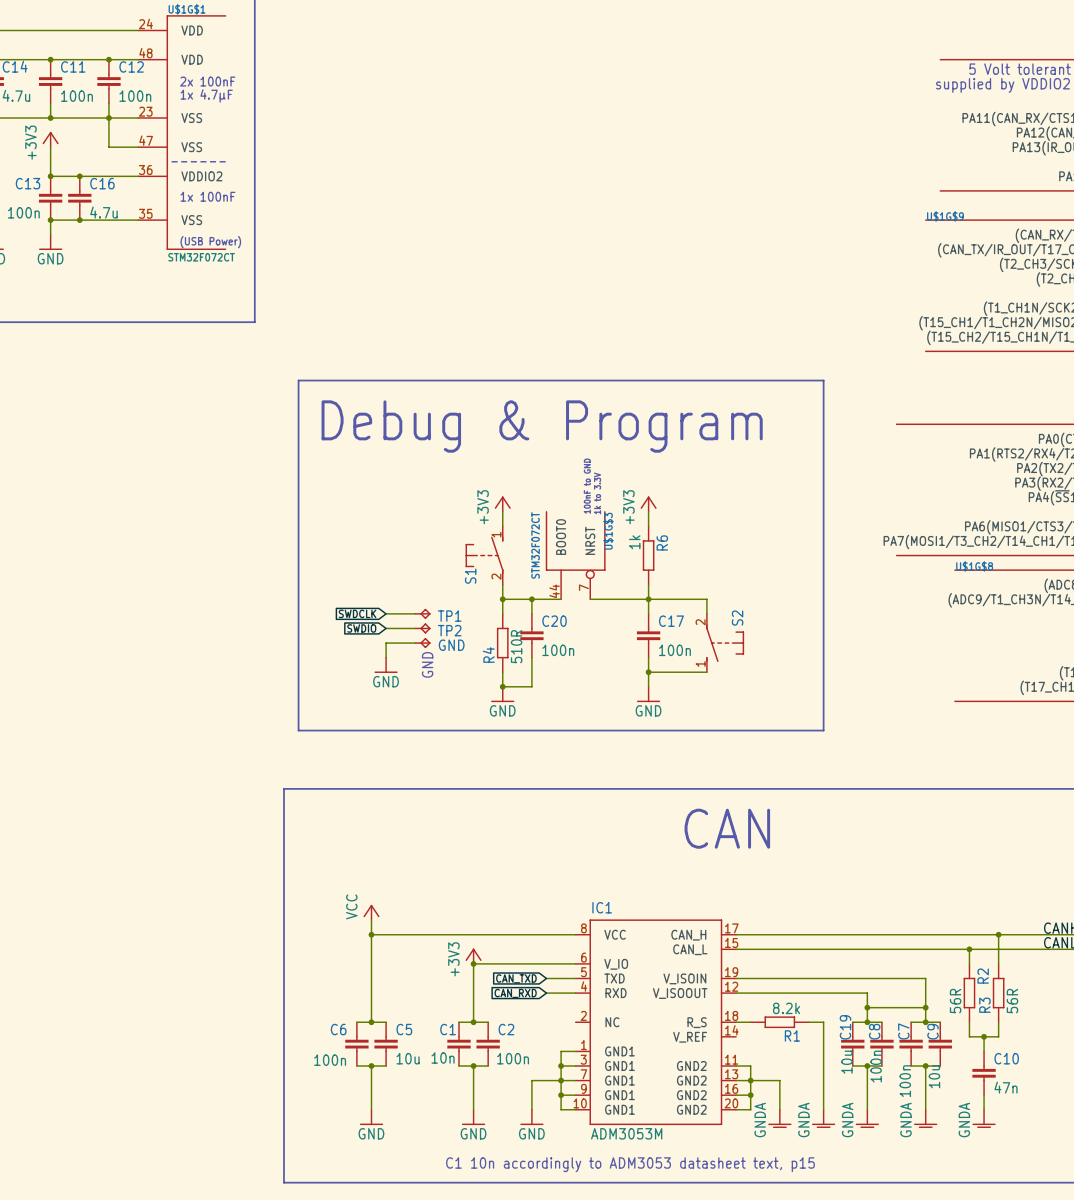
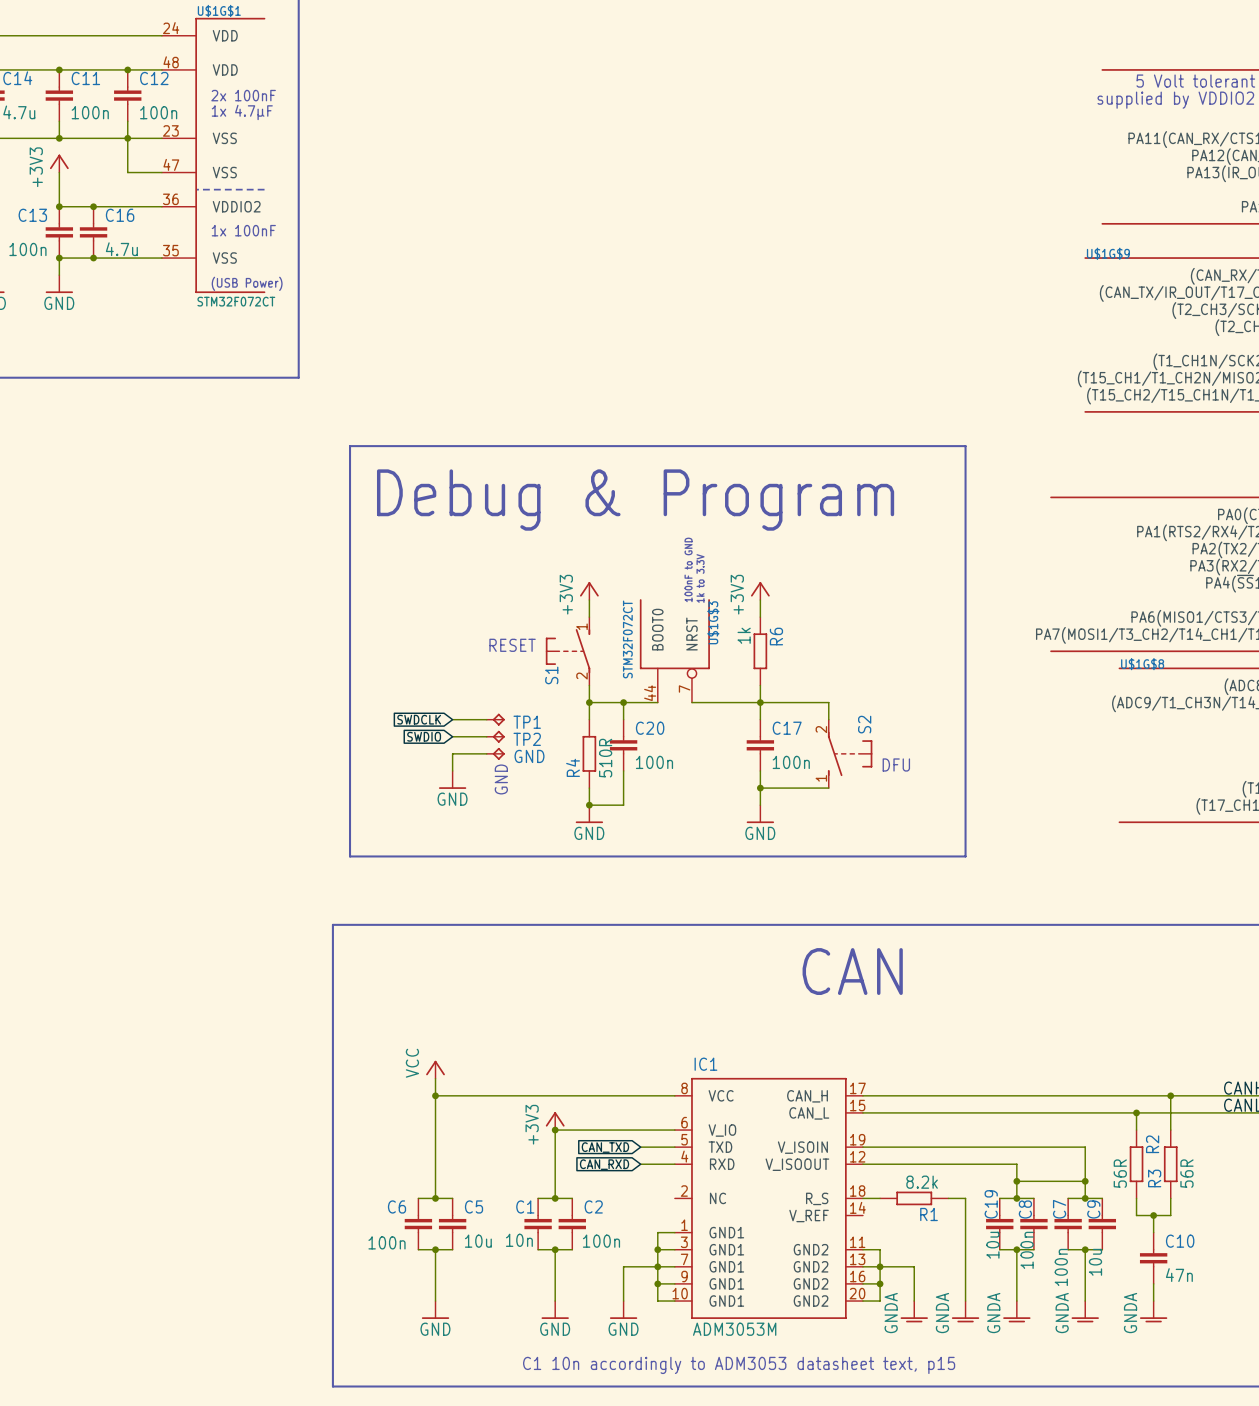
text: none -> RESET (512, 645)
text: none -> DFU (896, 764)

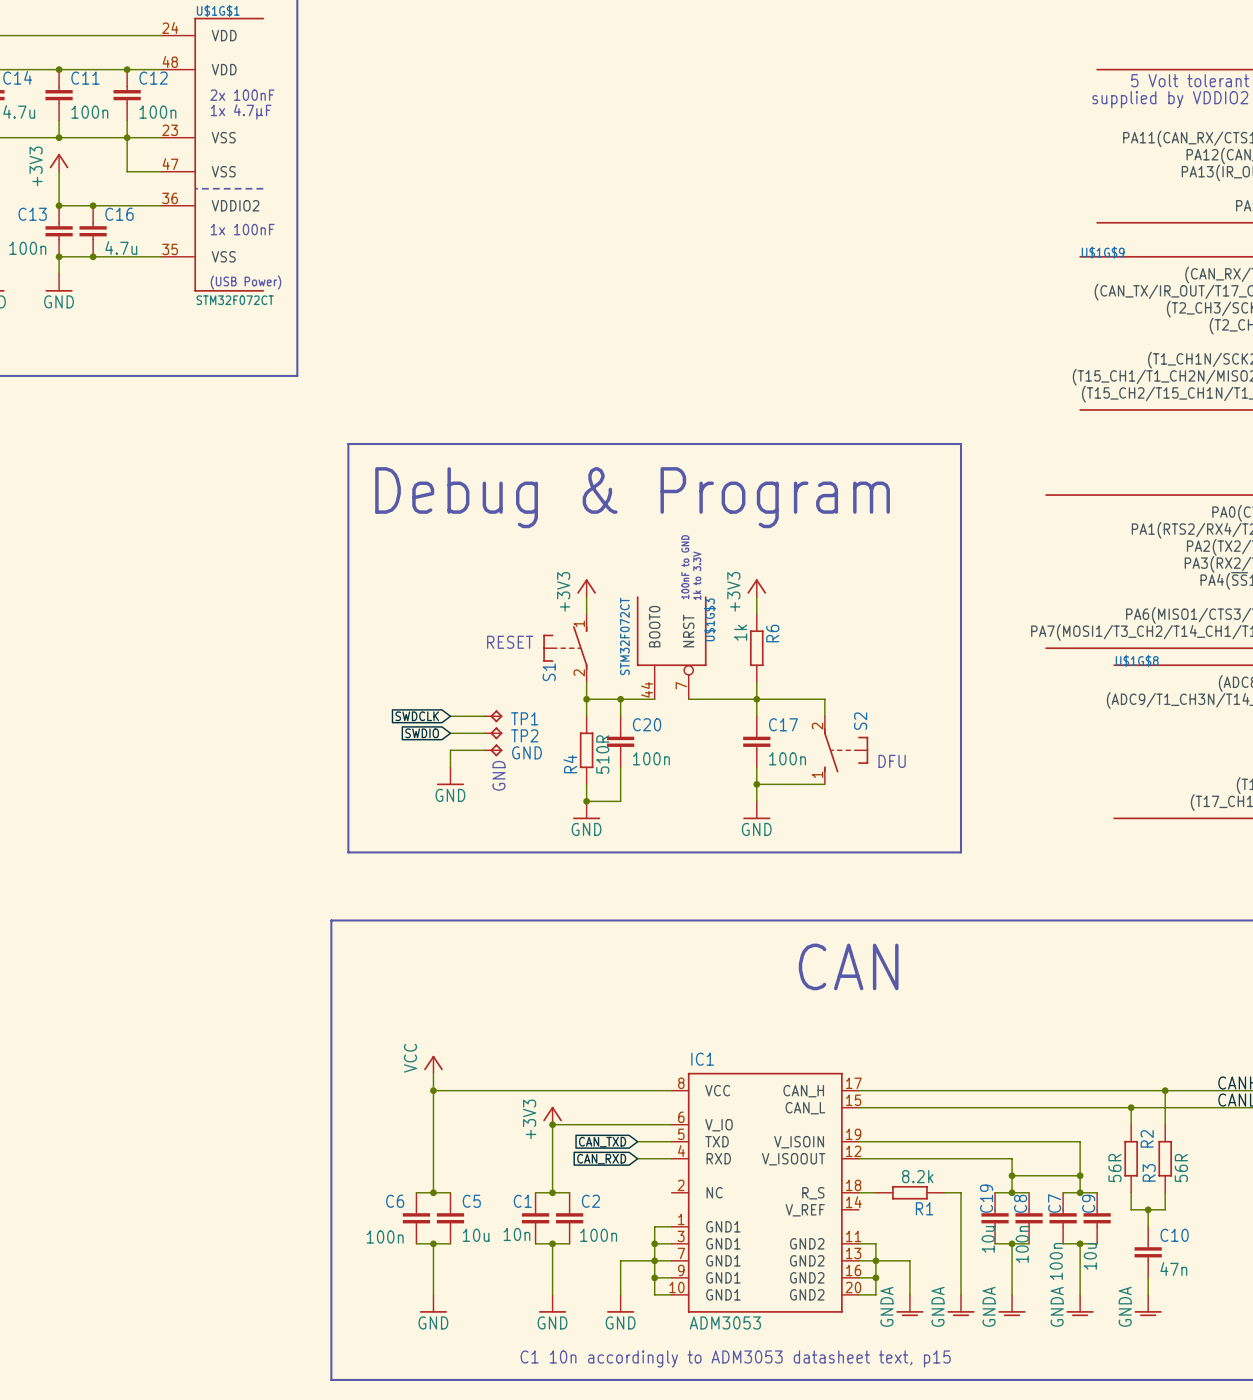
IC1 value: ADM3053M (734, 1329) -> ADM3053 (725, 1322)

